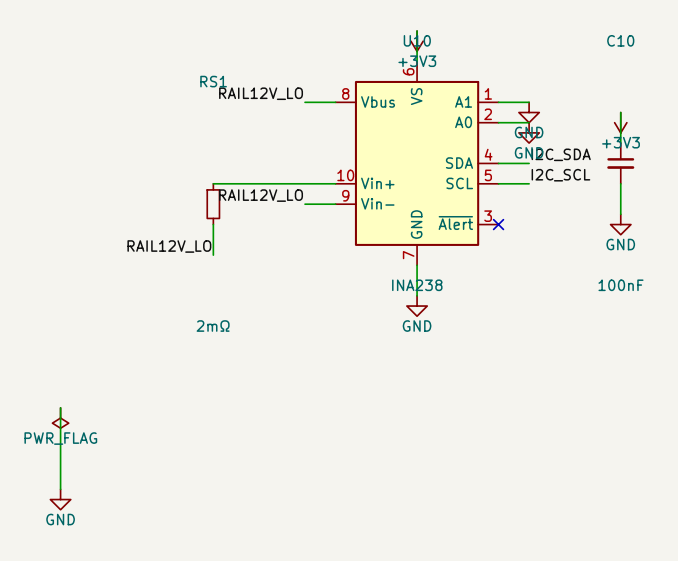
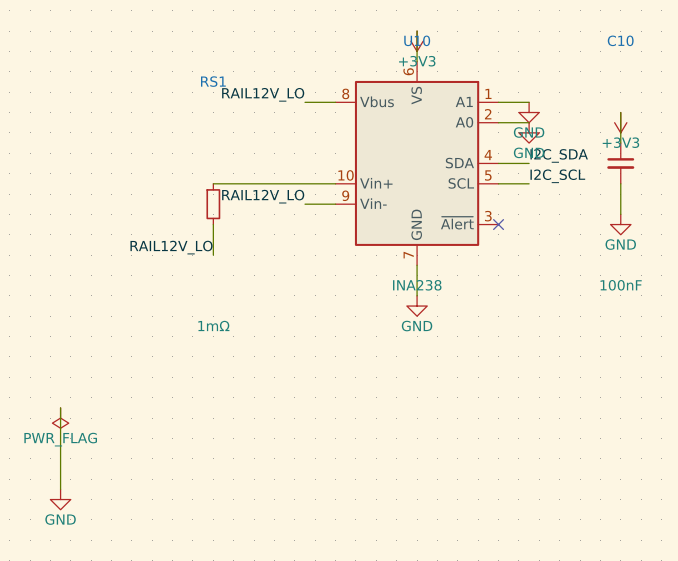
RS1 value: 2mΩ (213, 326) -> 1mΩ (213, 325)

